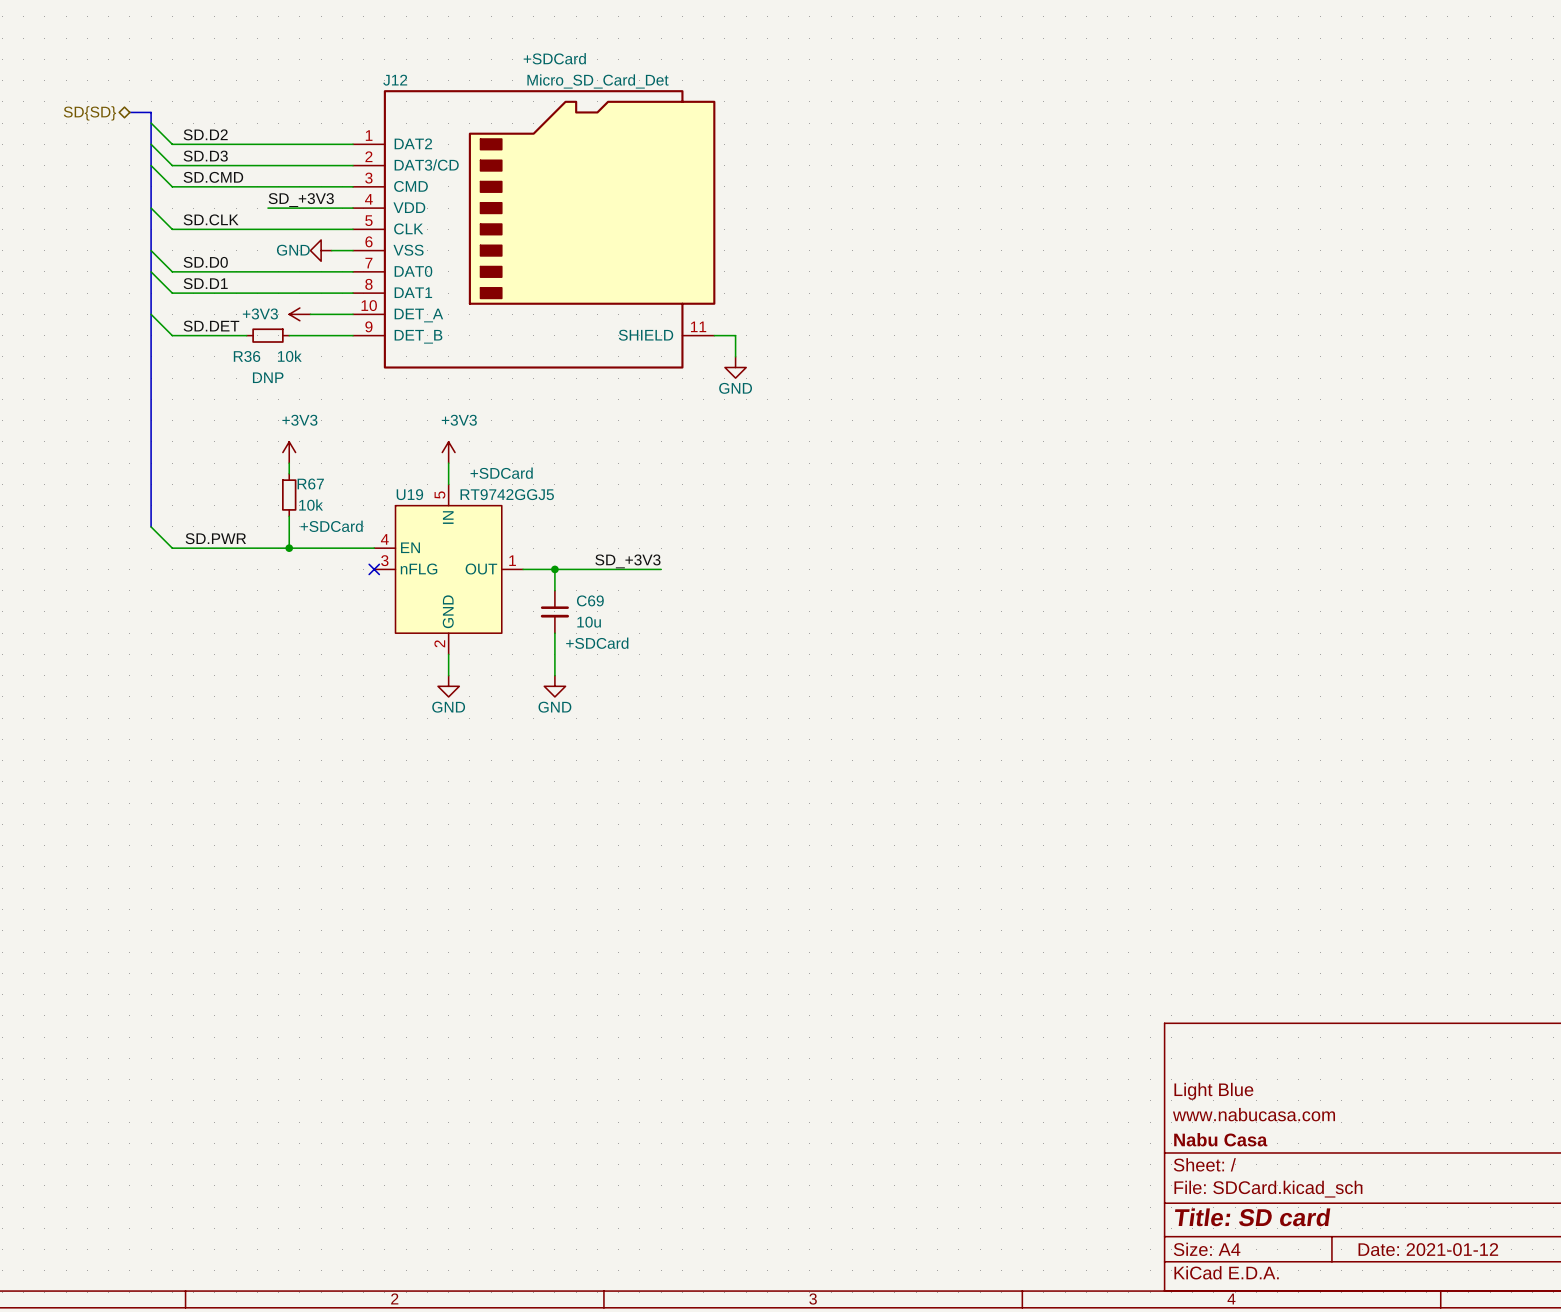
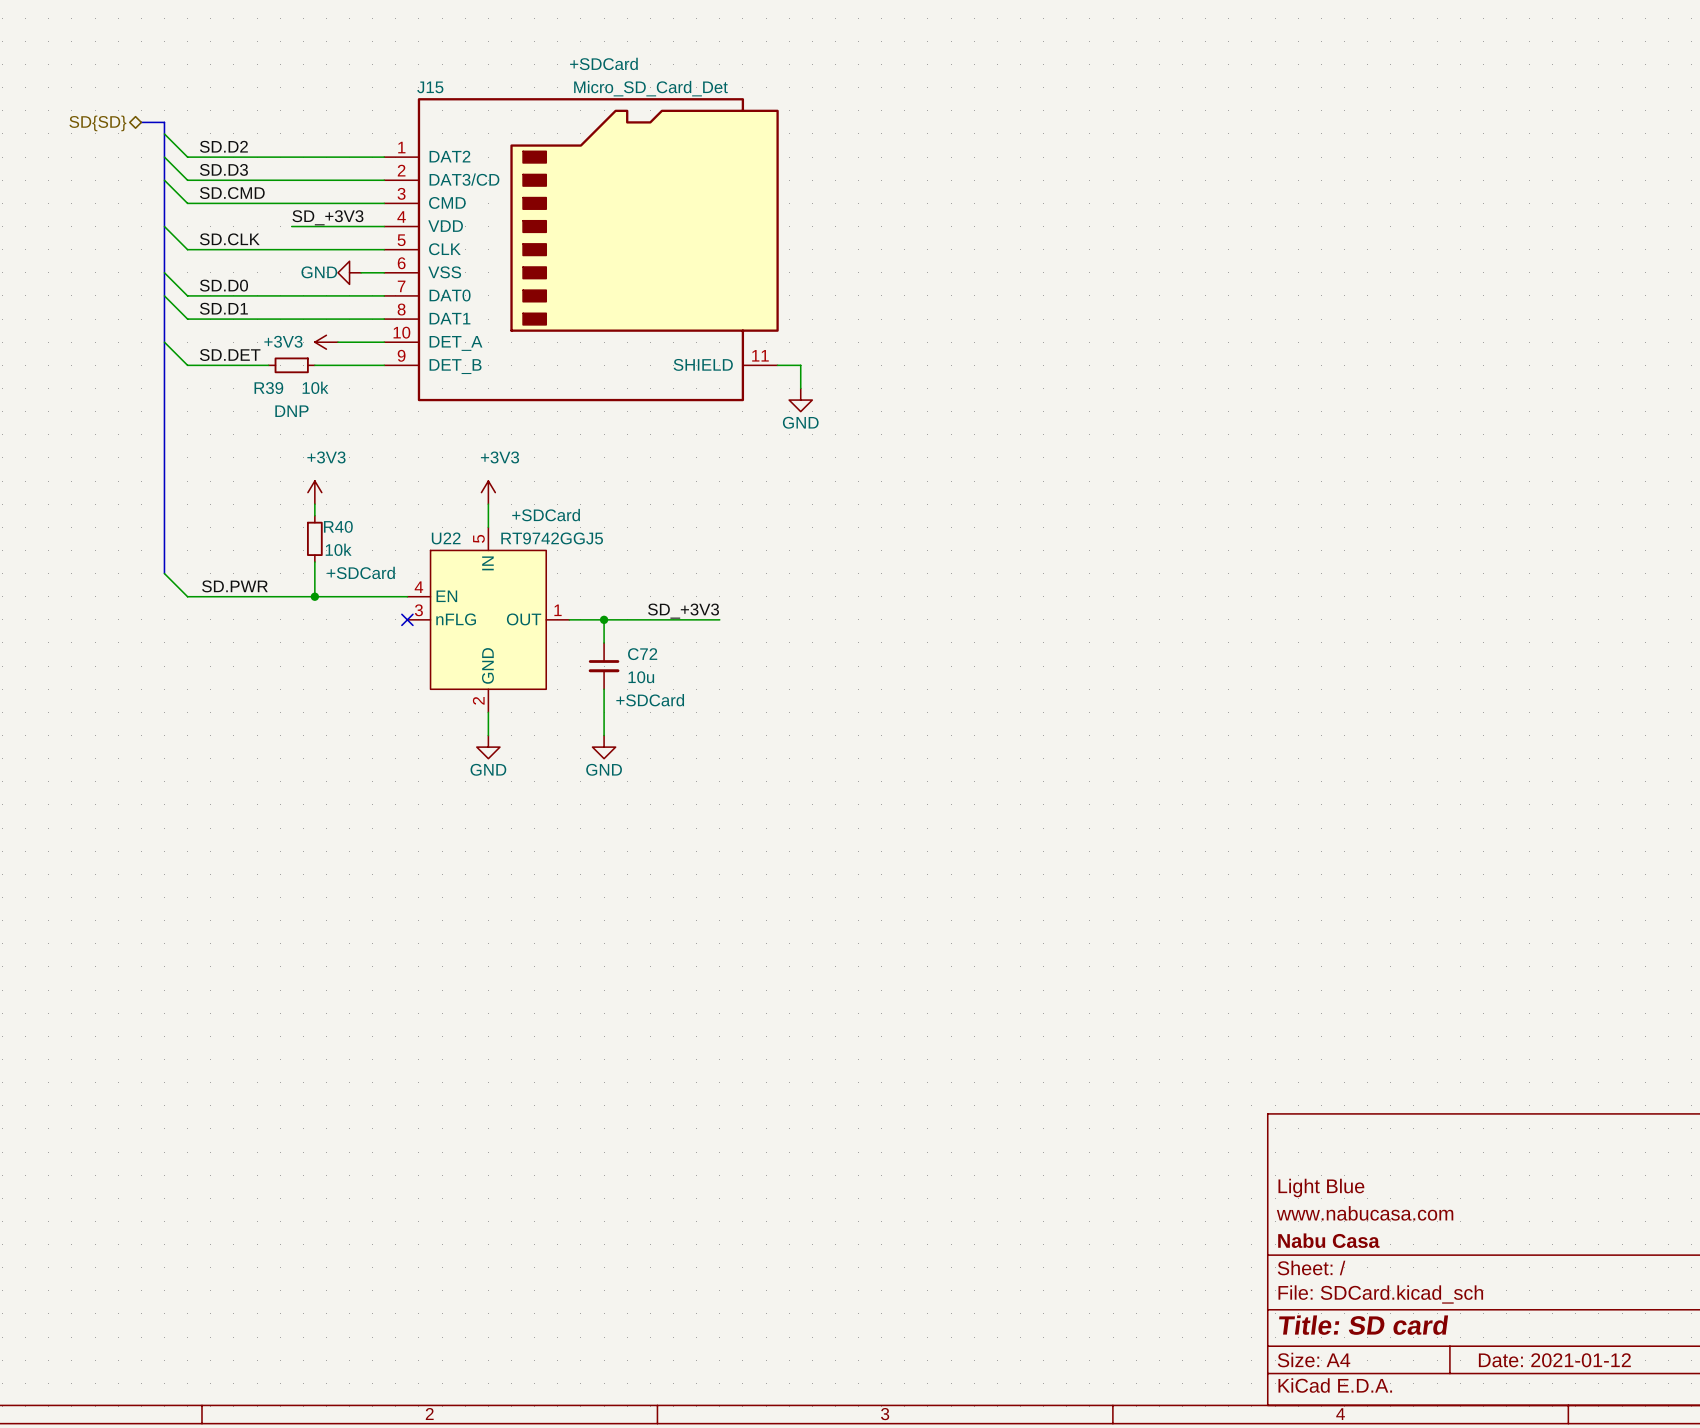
J12 name: J12 (395, 80) -> J15 (430, 87)
R36 name: R36 (247, 356) -> R39 (268, 388)
R67 name: R67 (310, 484) -> R40 (338, 526)
U19 name: U19 (409, 494) -> U22 (446, 538)
C69 name: C69 (590, 600) -> C72 (642, 654)

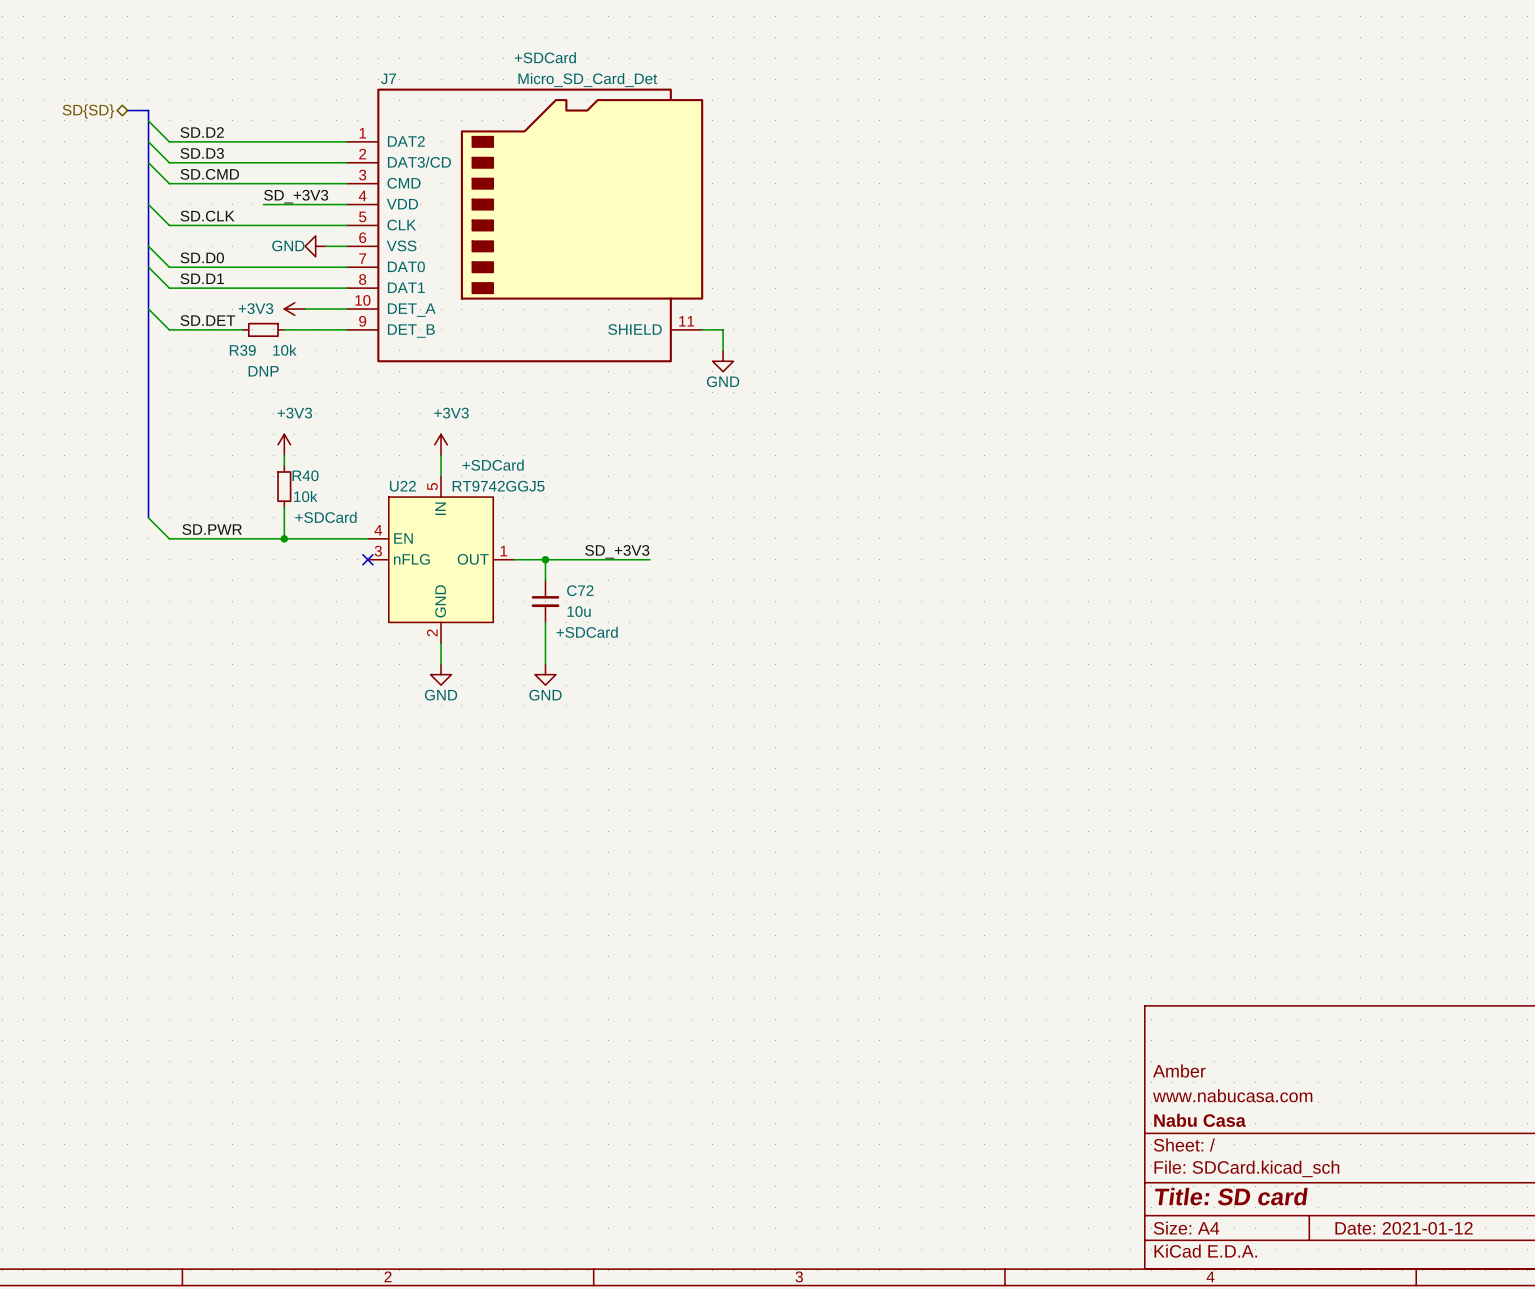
J15 name: J15 (430, 87) -> J7 (388, 78)
title block: Light Blue (1321, 1187) -> Amber (1179, 1070)

